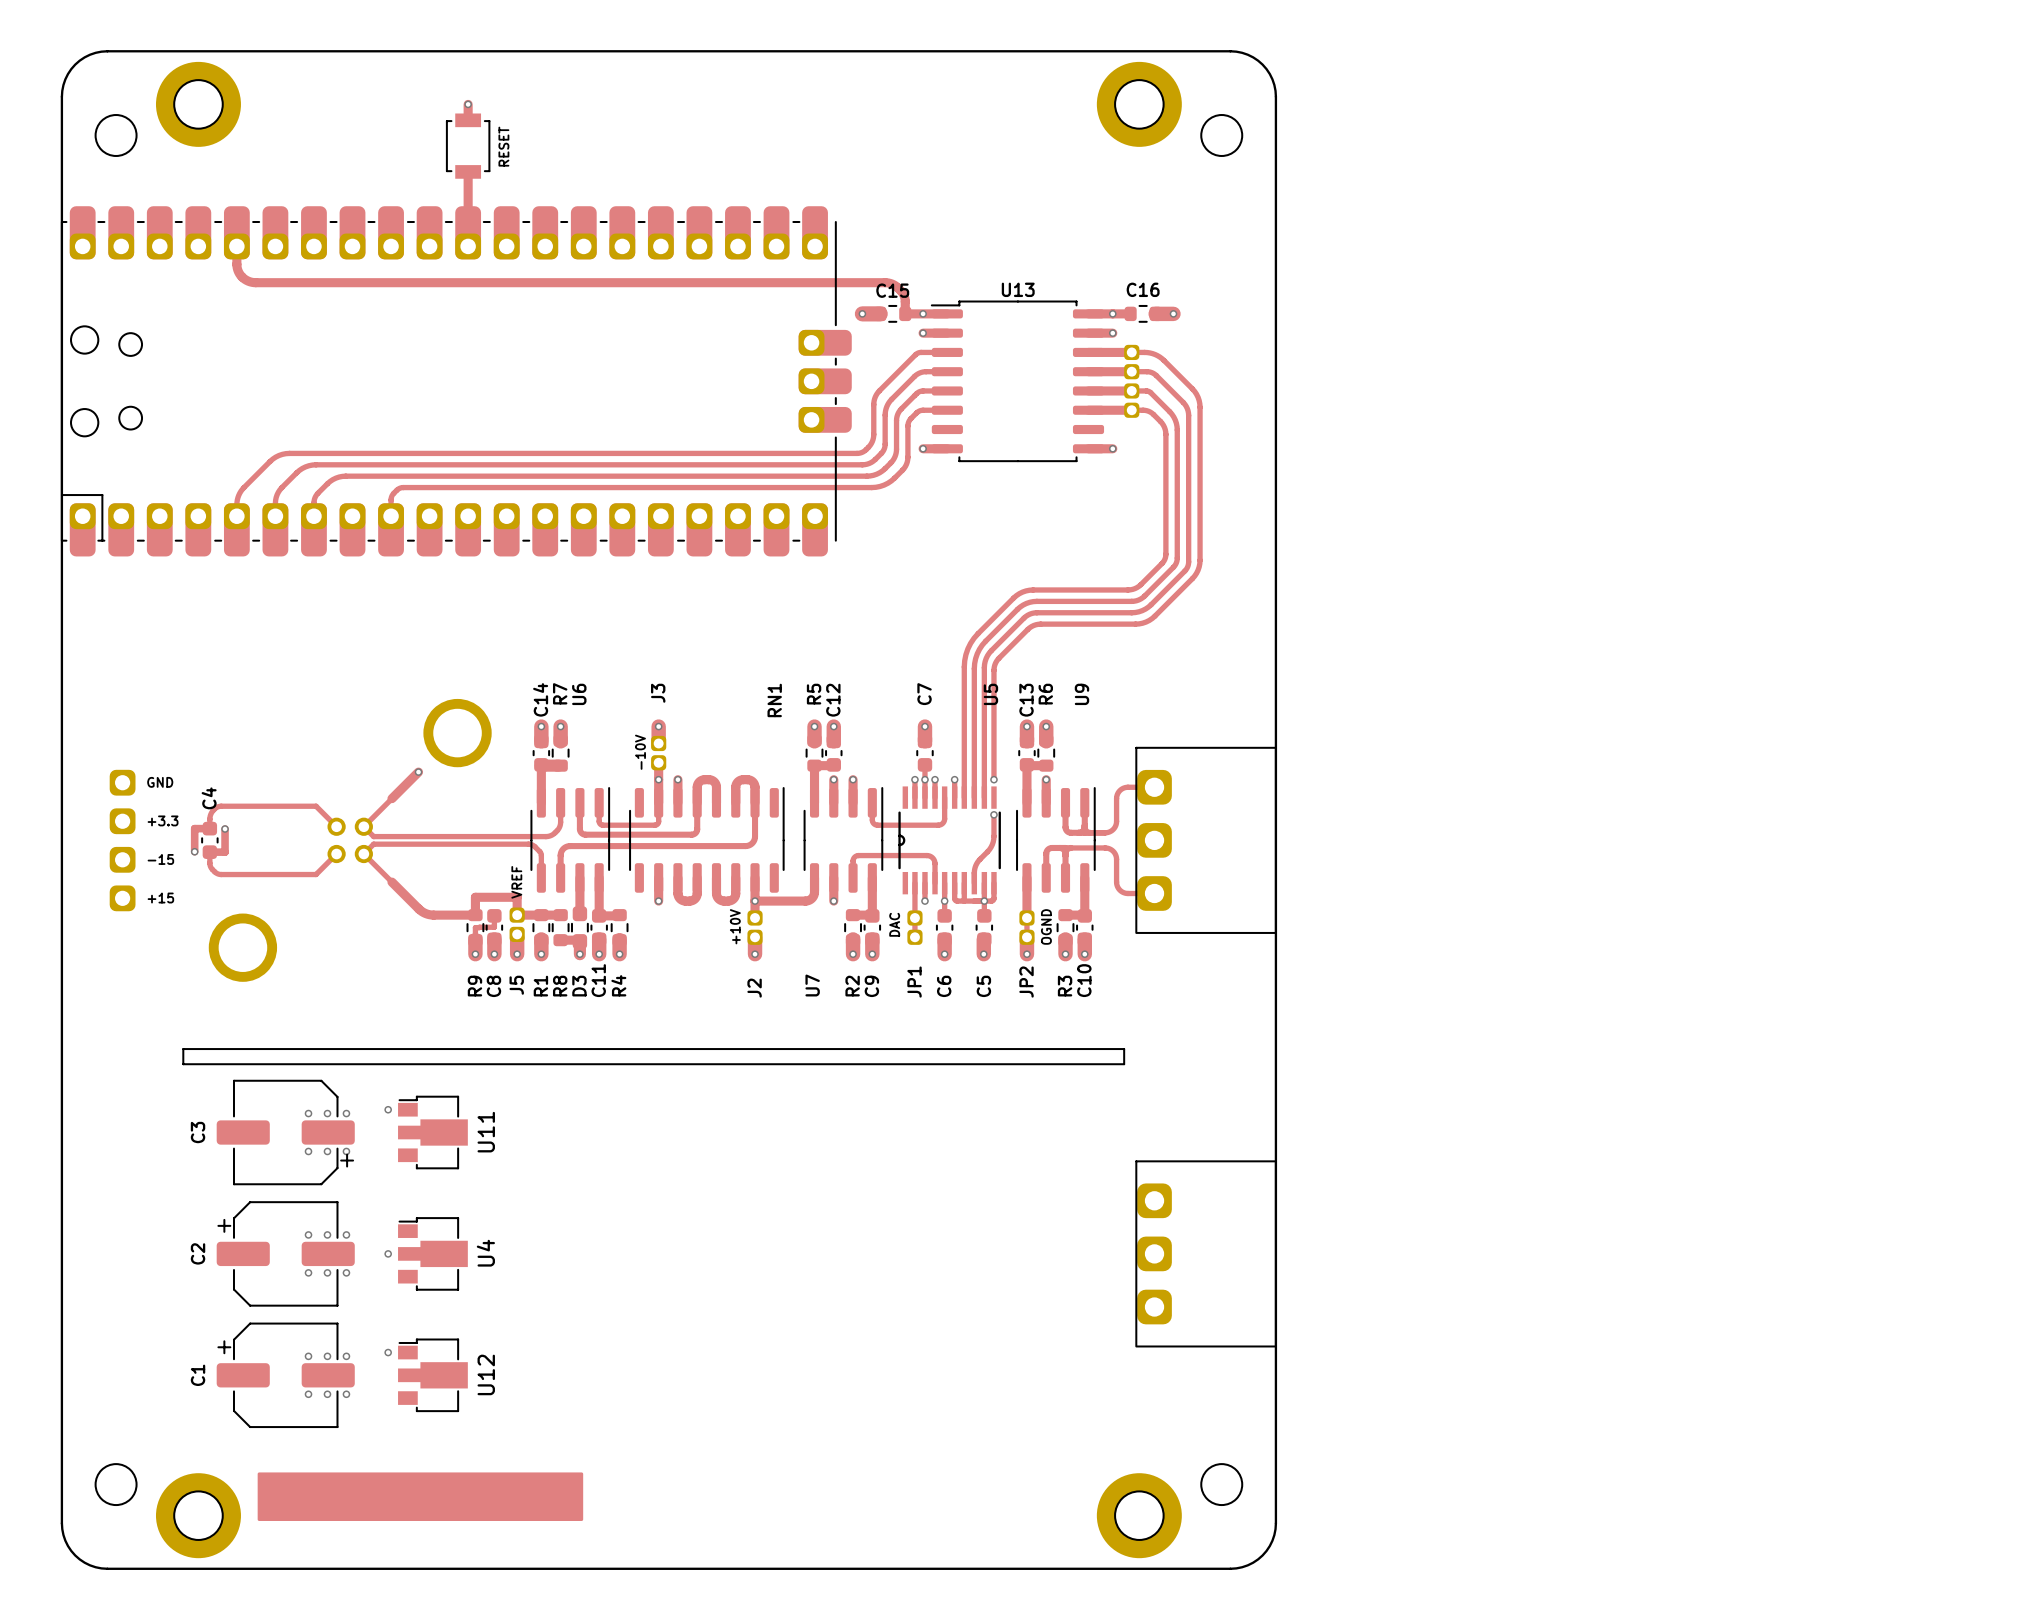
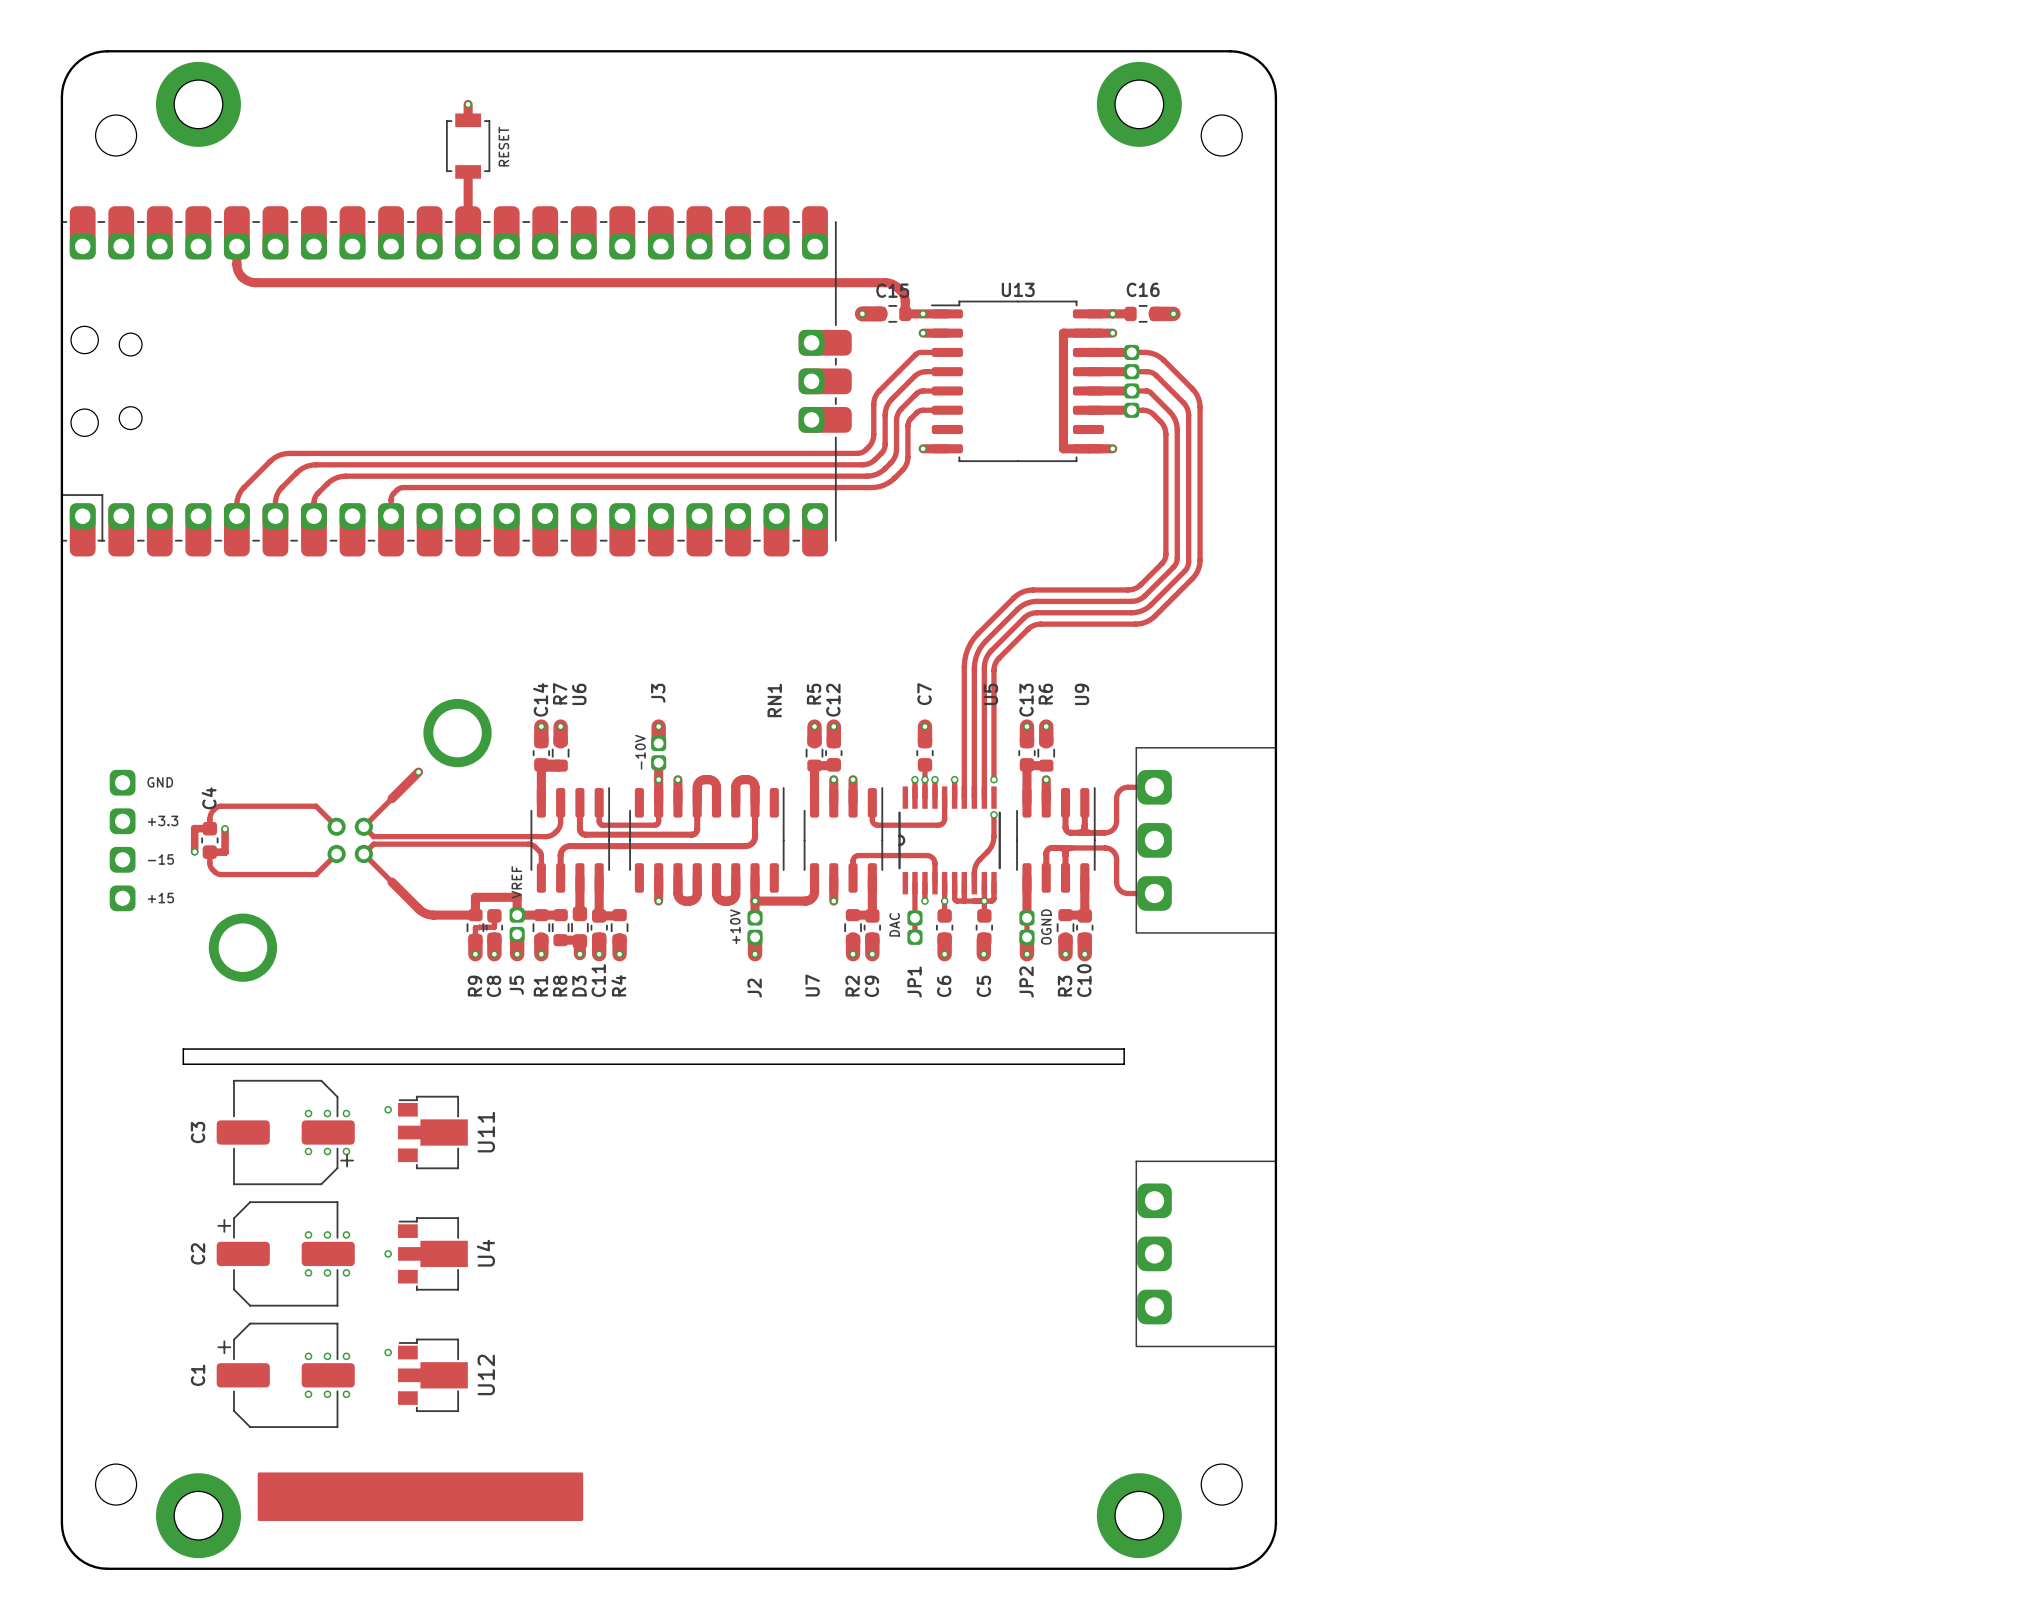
track: none -> (1088, 333) (1063, 333) (1063, 448) (1088, 448)

